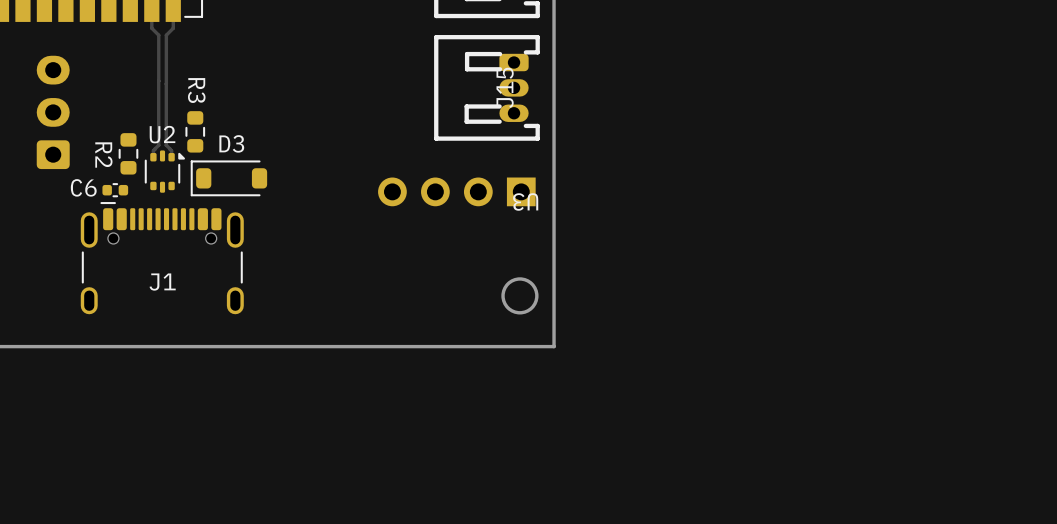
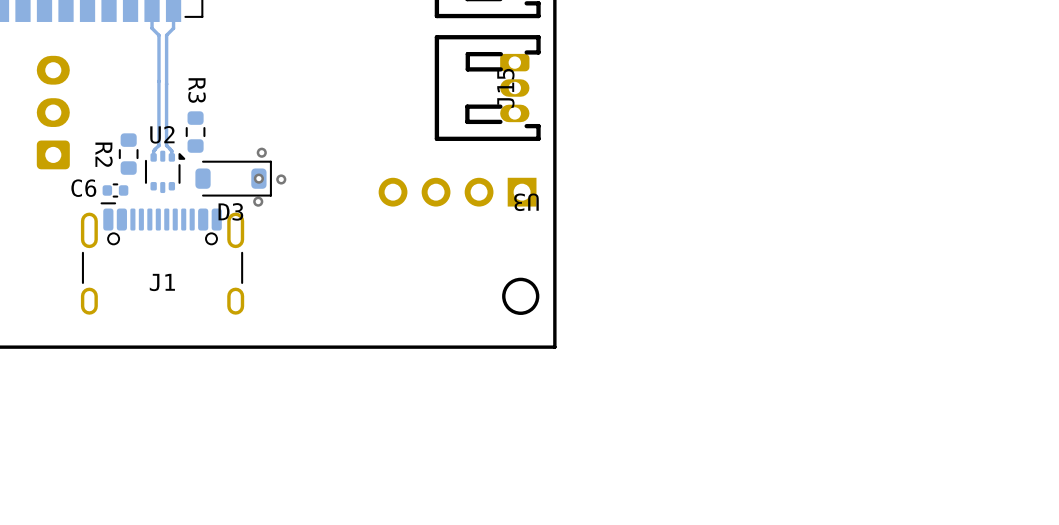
via: none -> (261, 152)
D3 rotation: 0° (228, 178) -> 180° (233, 178)
via: none -> (258, 178)
via: none -> (281, 179)
via: none -> (258, 201)

